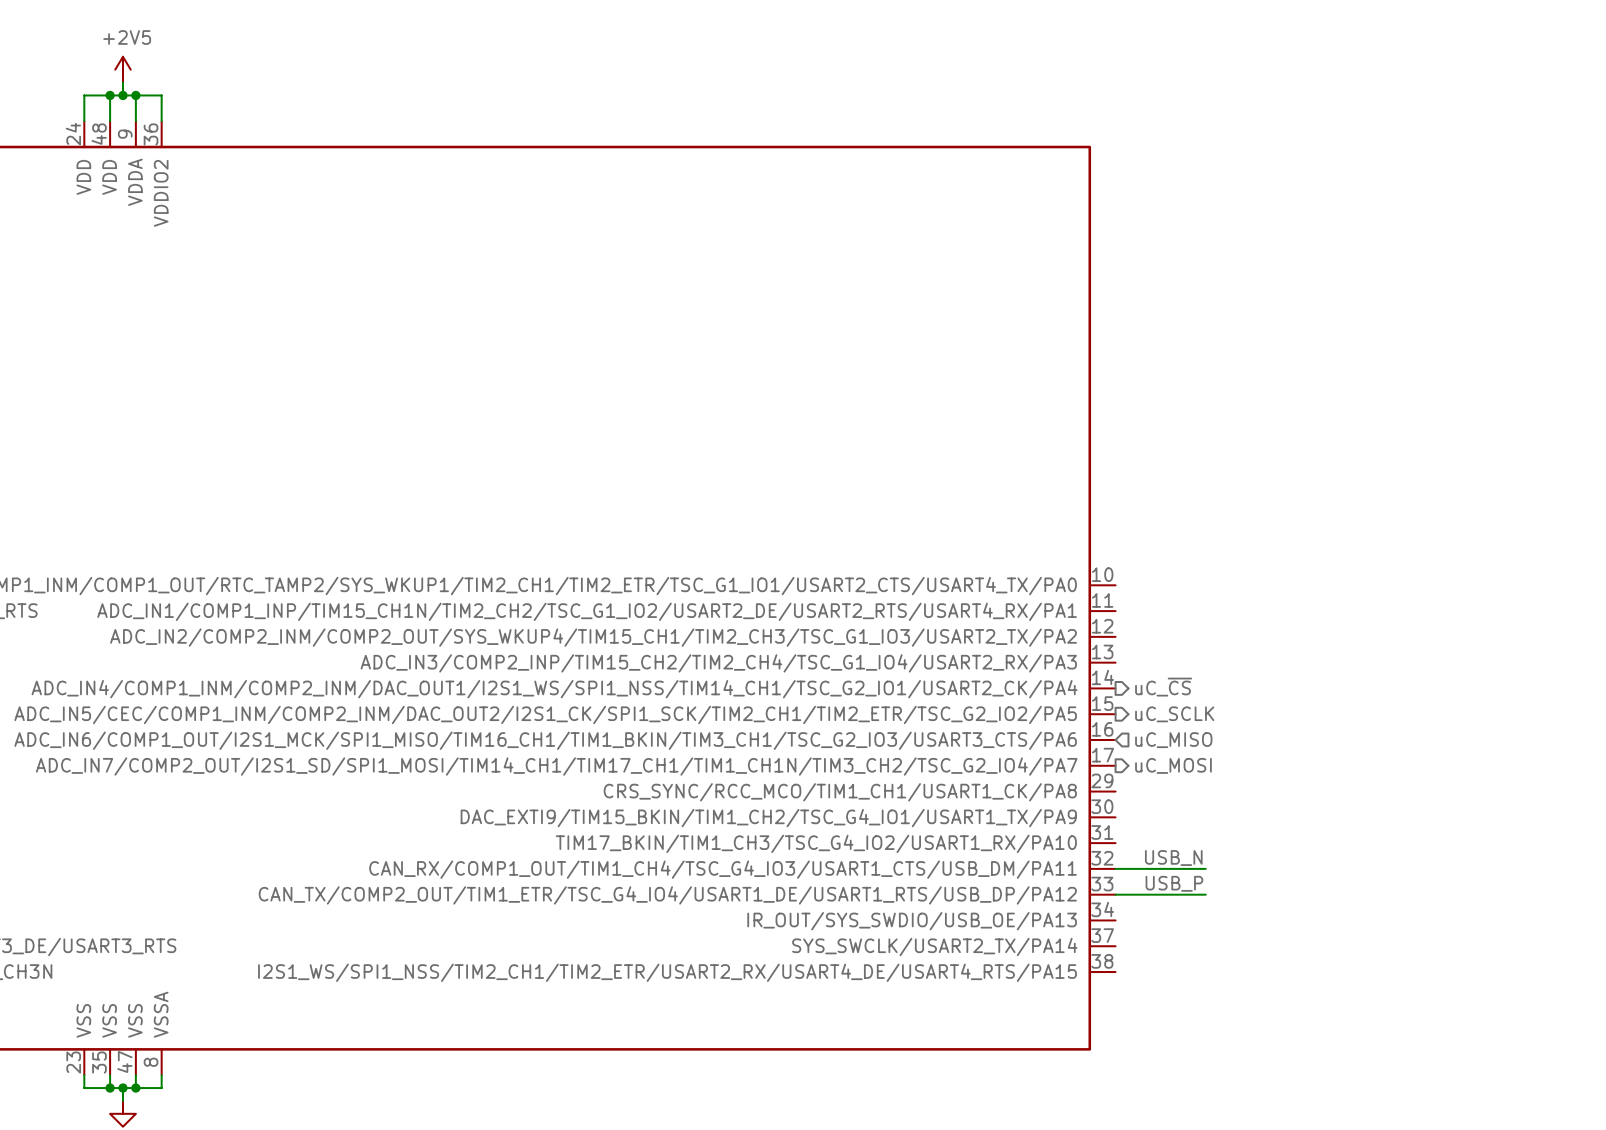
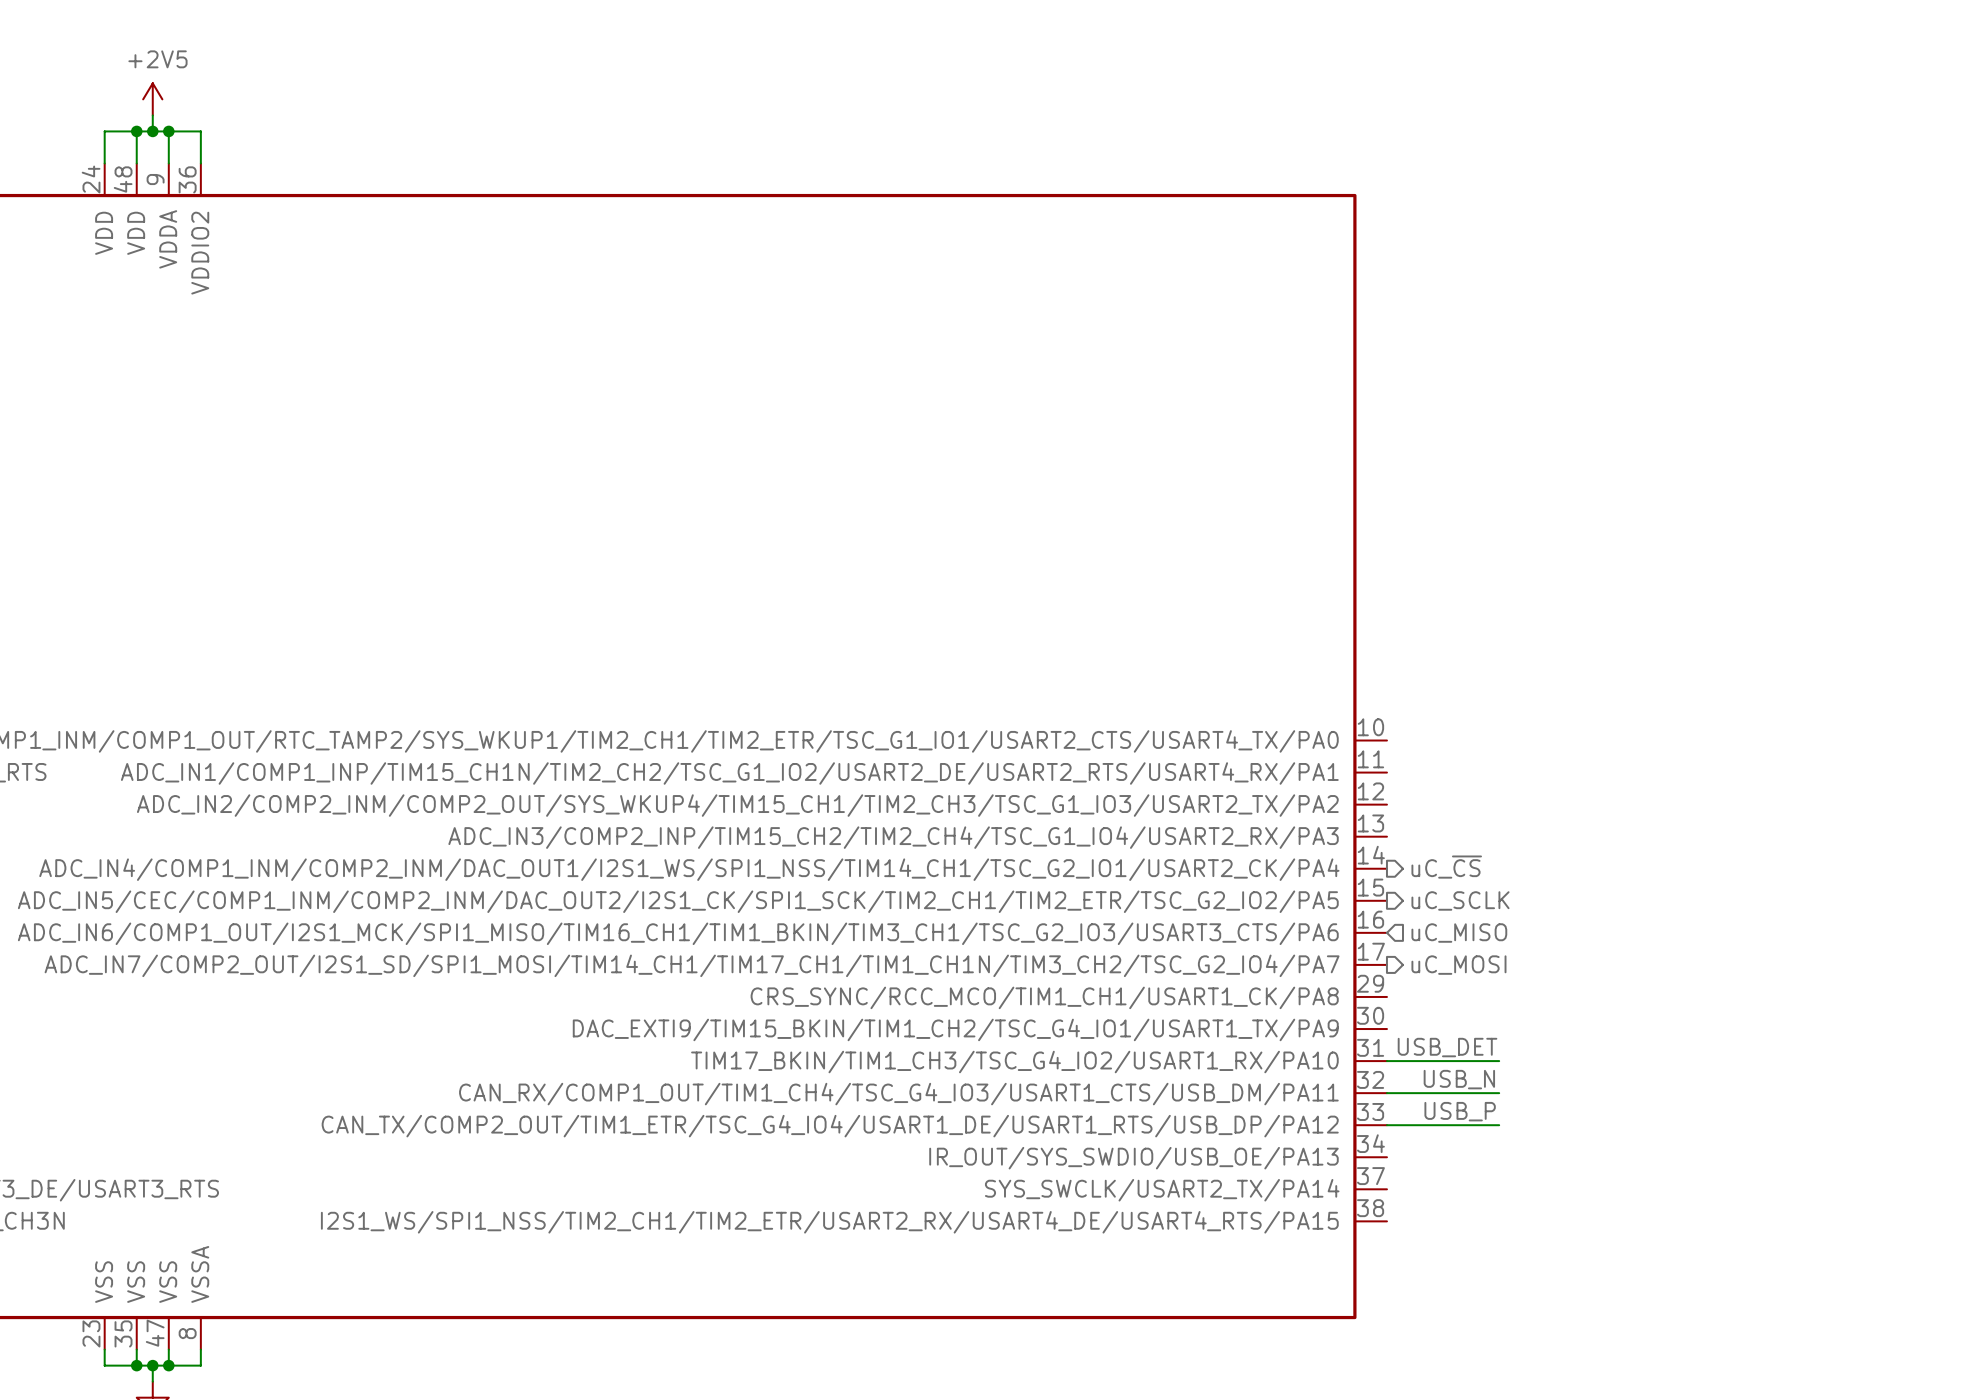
label: none -> USB_DET (1447, 1047)
wire: none -> (1386, 1061) (1499, 1061)

